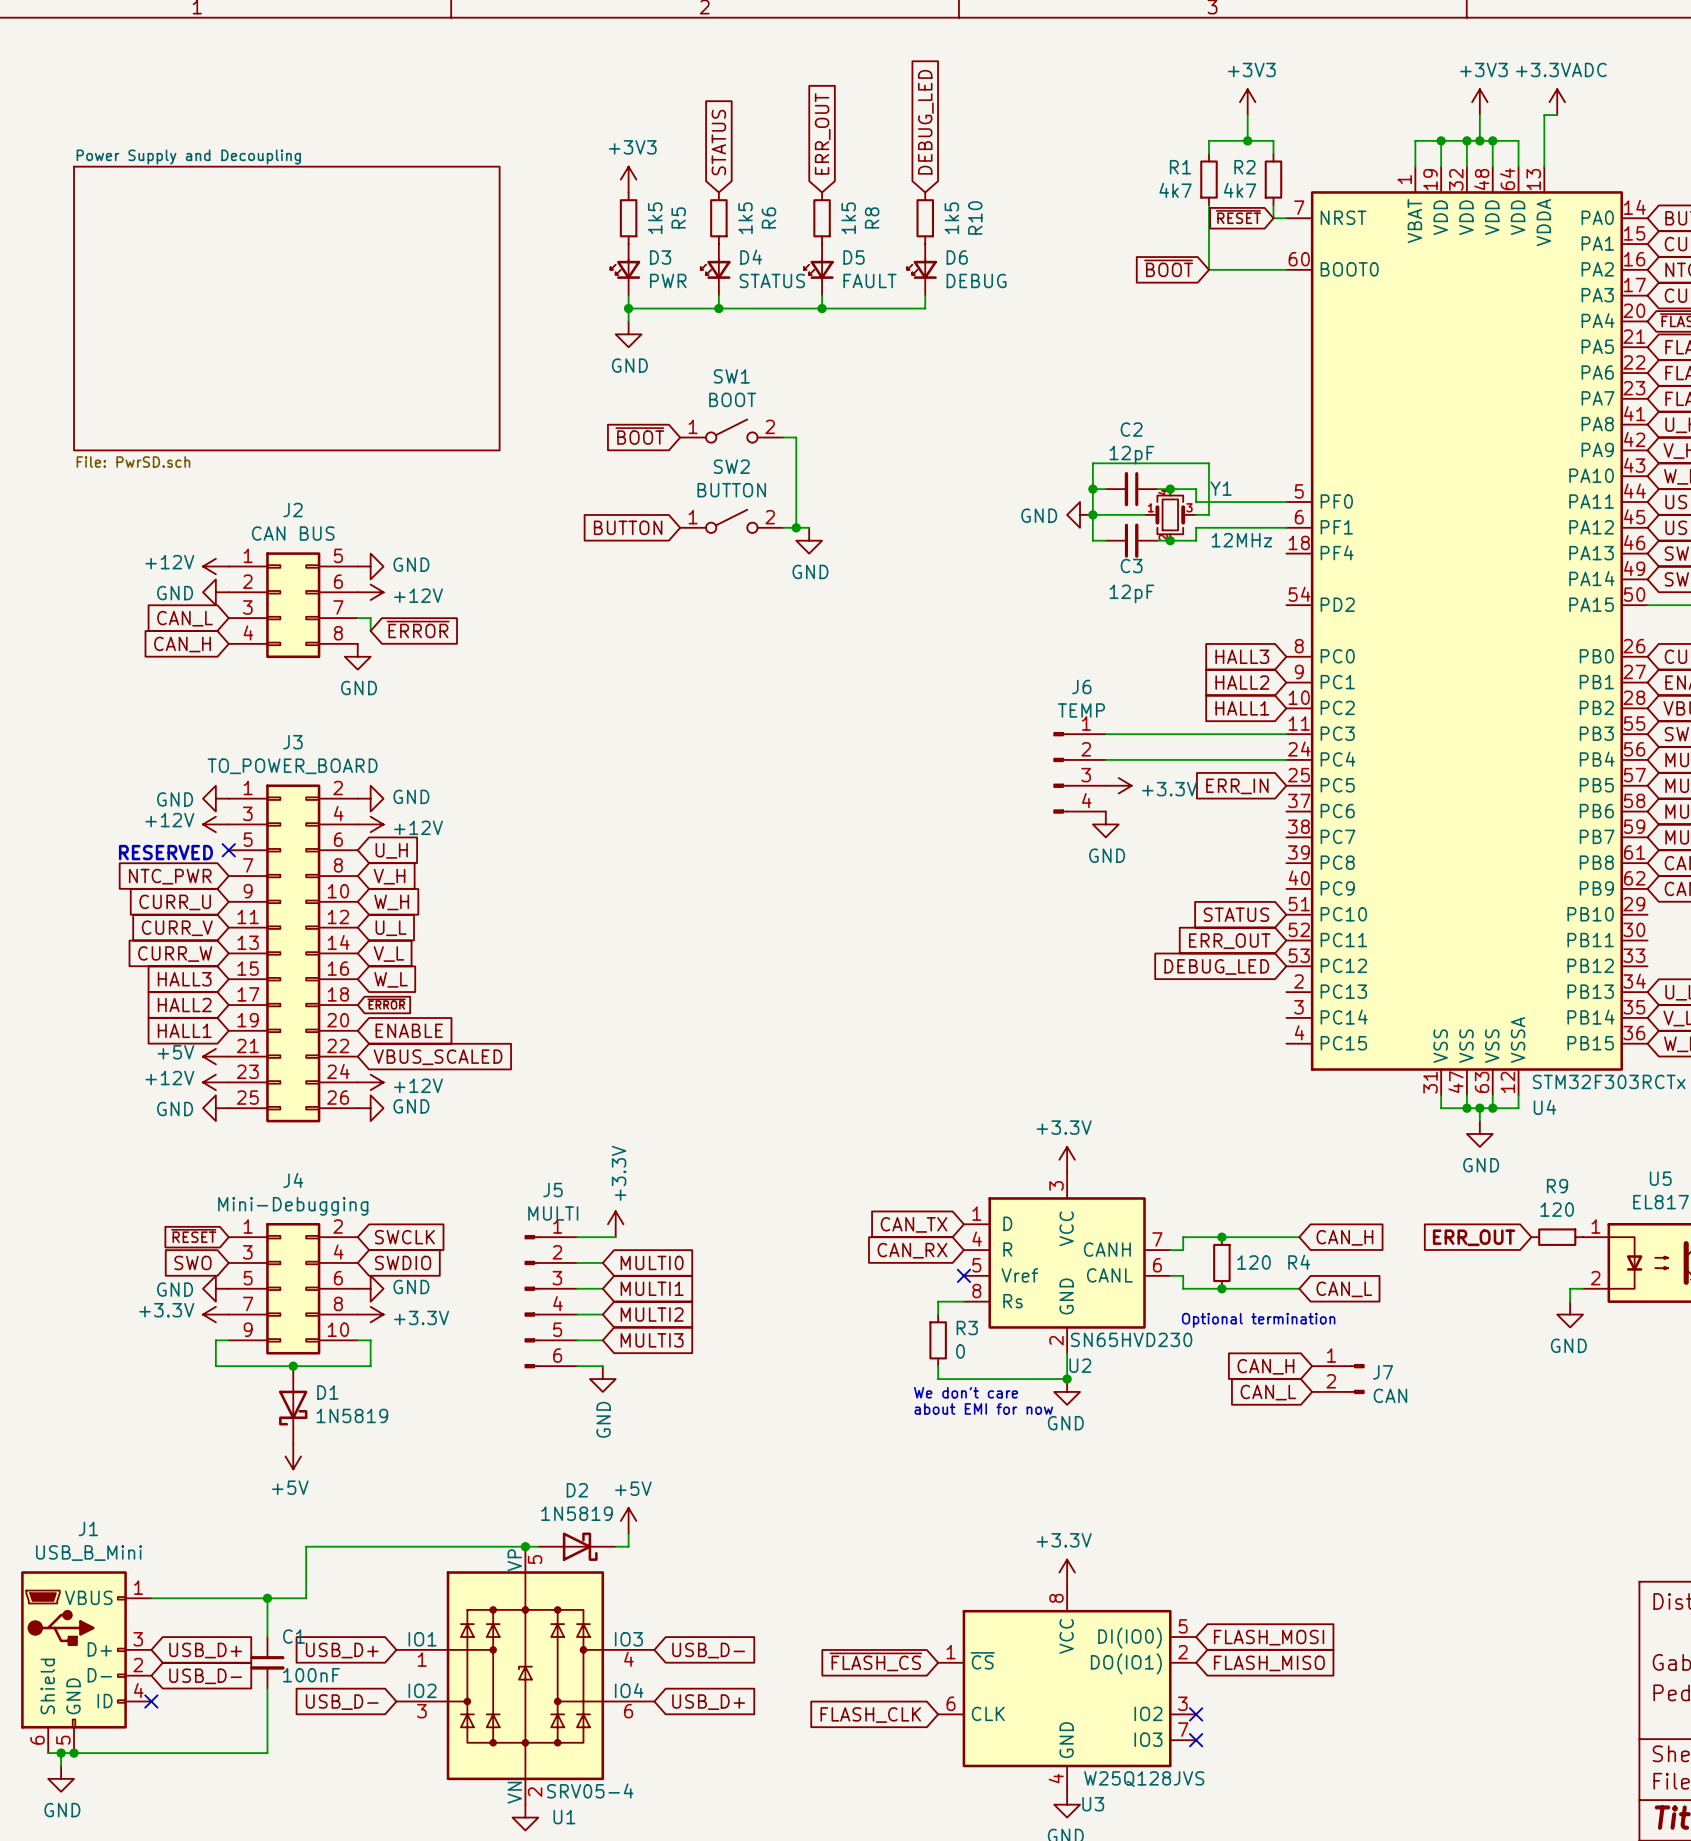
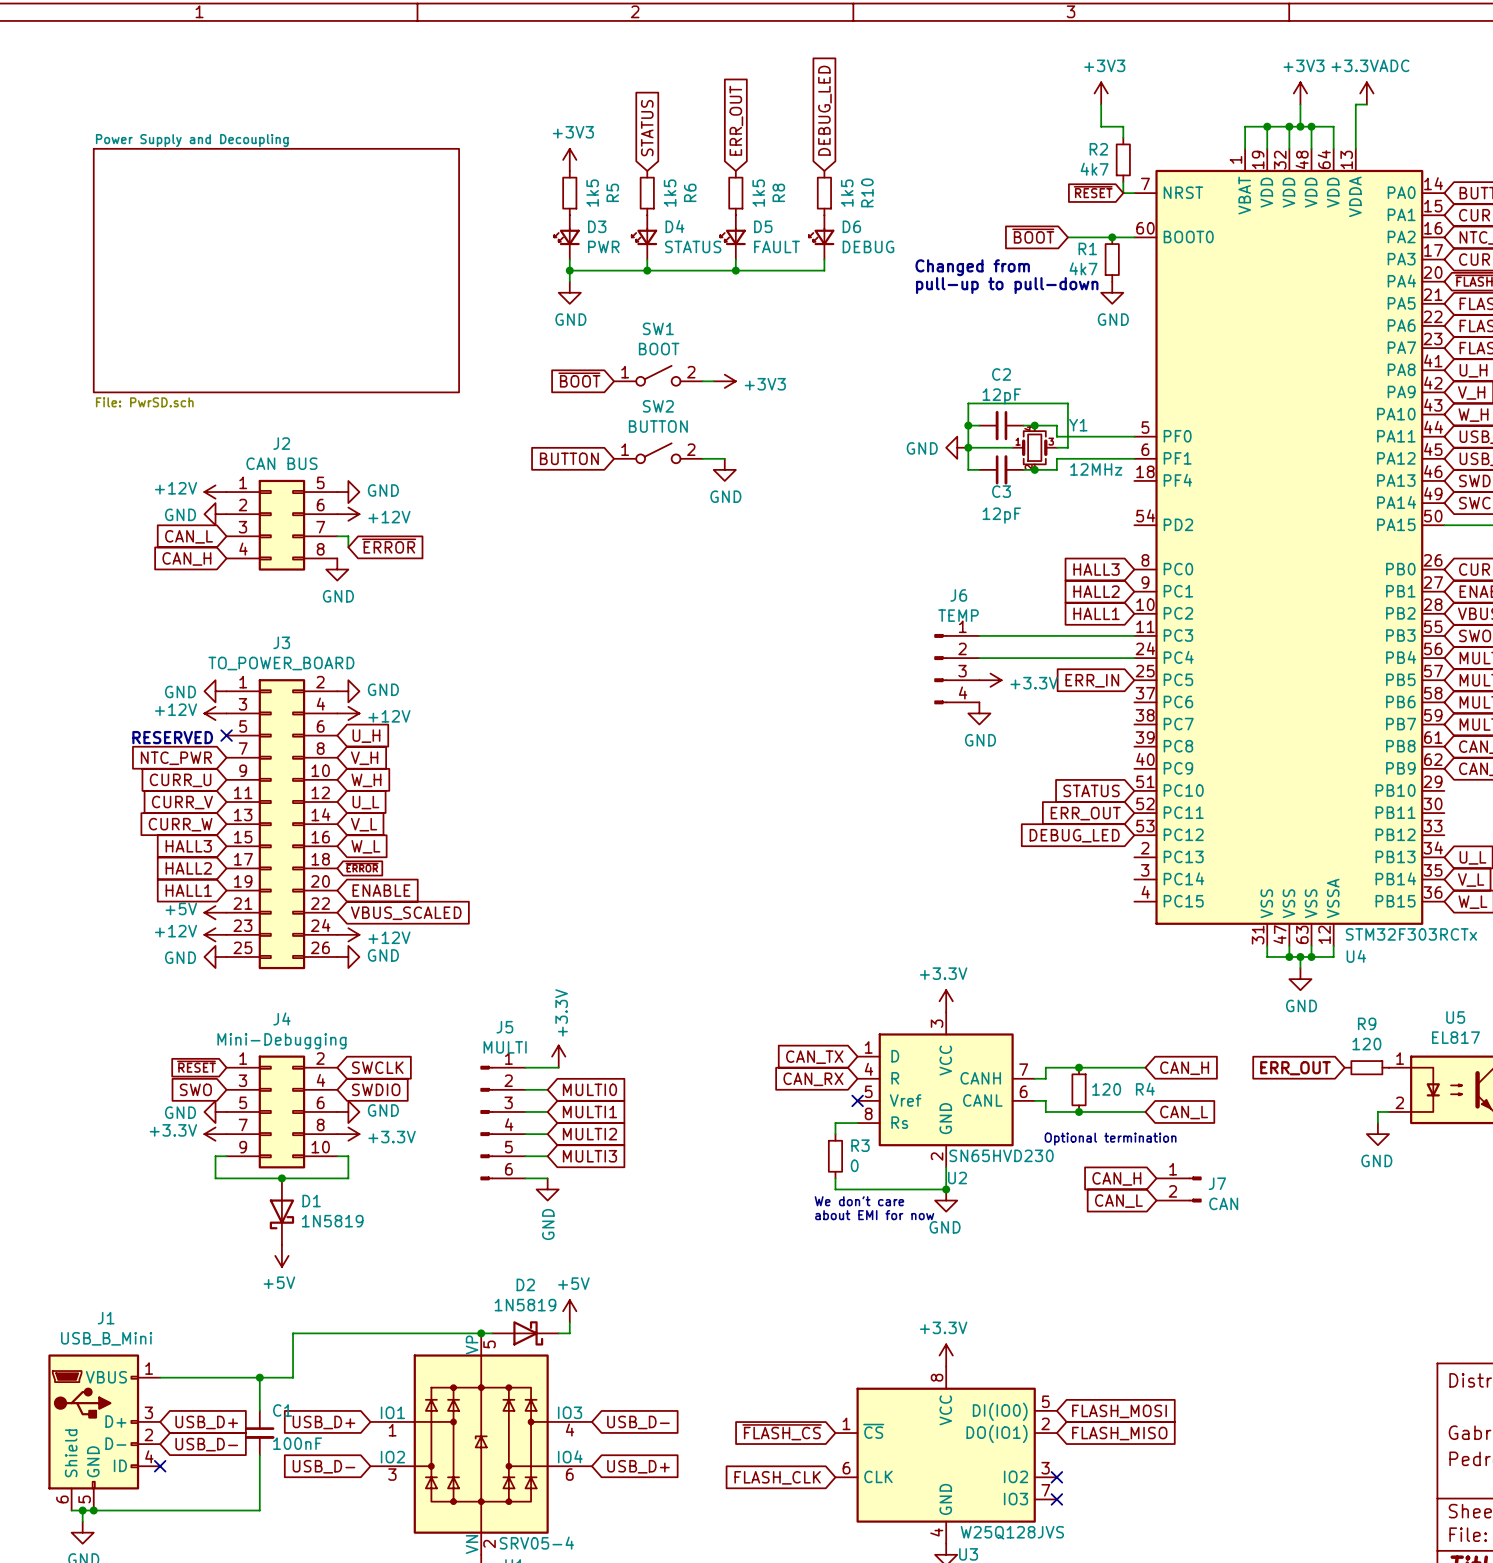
wire: (1247, 140) (1208, 140) (1208, 153) -> none
junction: (1247, 140) -> none
R1 position: (1208, 179) -> (1112, 259)
wire: (1208, 205) (1208, 269) -> none
junction: none -> (1112, 237)
text: none -> Changed from (972, 267)
text: none -> pull-up to pull-down (1007, 285)
power symbol: none -> GND (1112, 292)
wire: (796, 437) (796, 527) -> none
power symbol: none -> +3V3 (724, 381)
junction: (796, 527) -> none

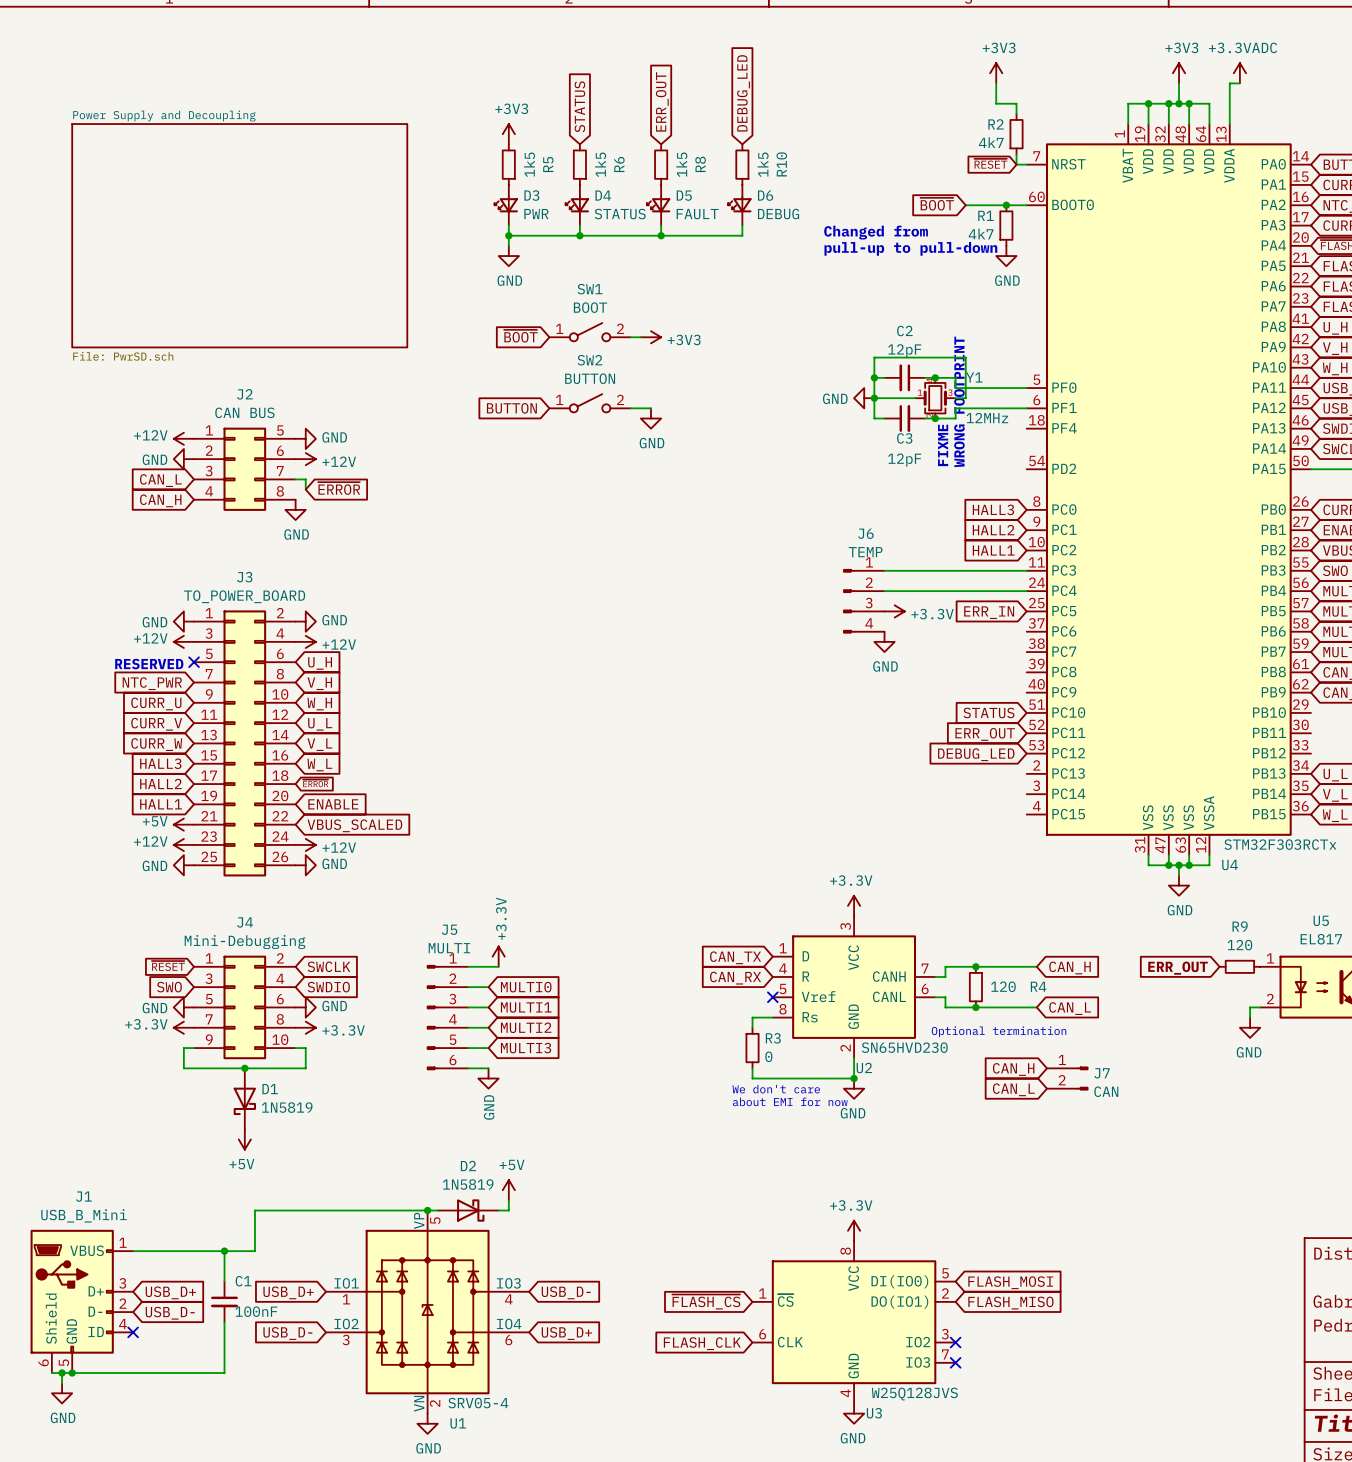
text: none -> WRONG FOOTPRINT (959, 401)
text: none -> FIXME (943, 445)

